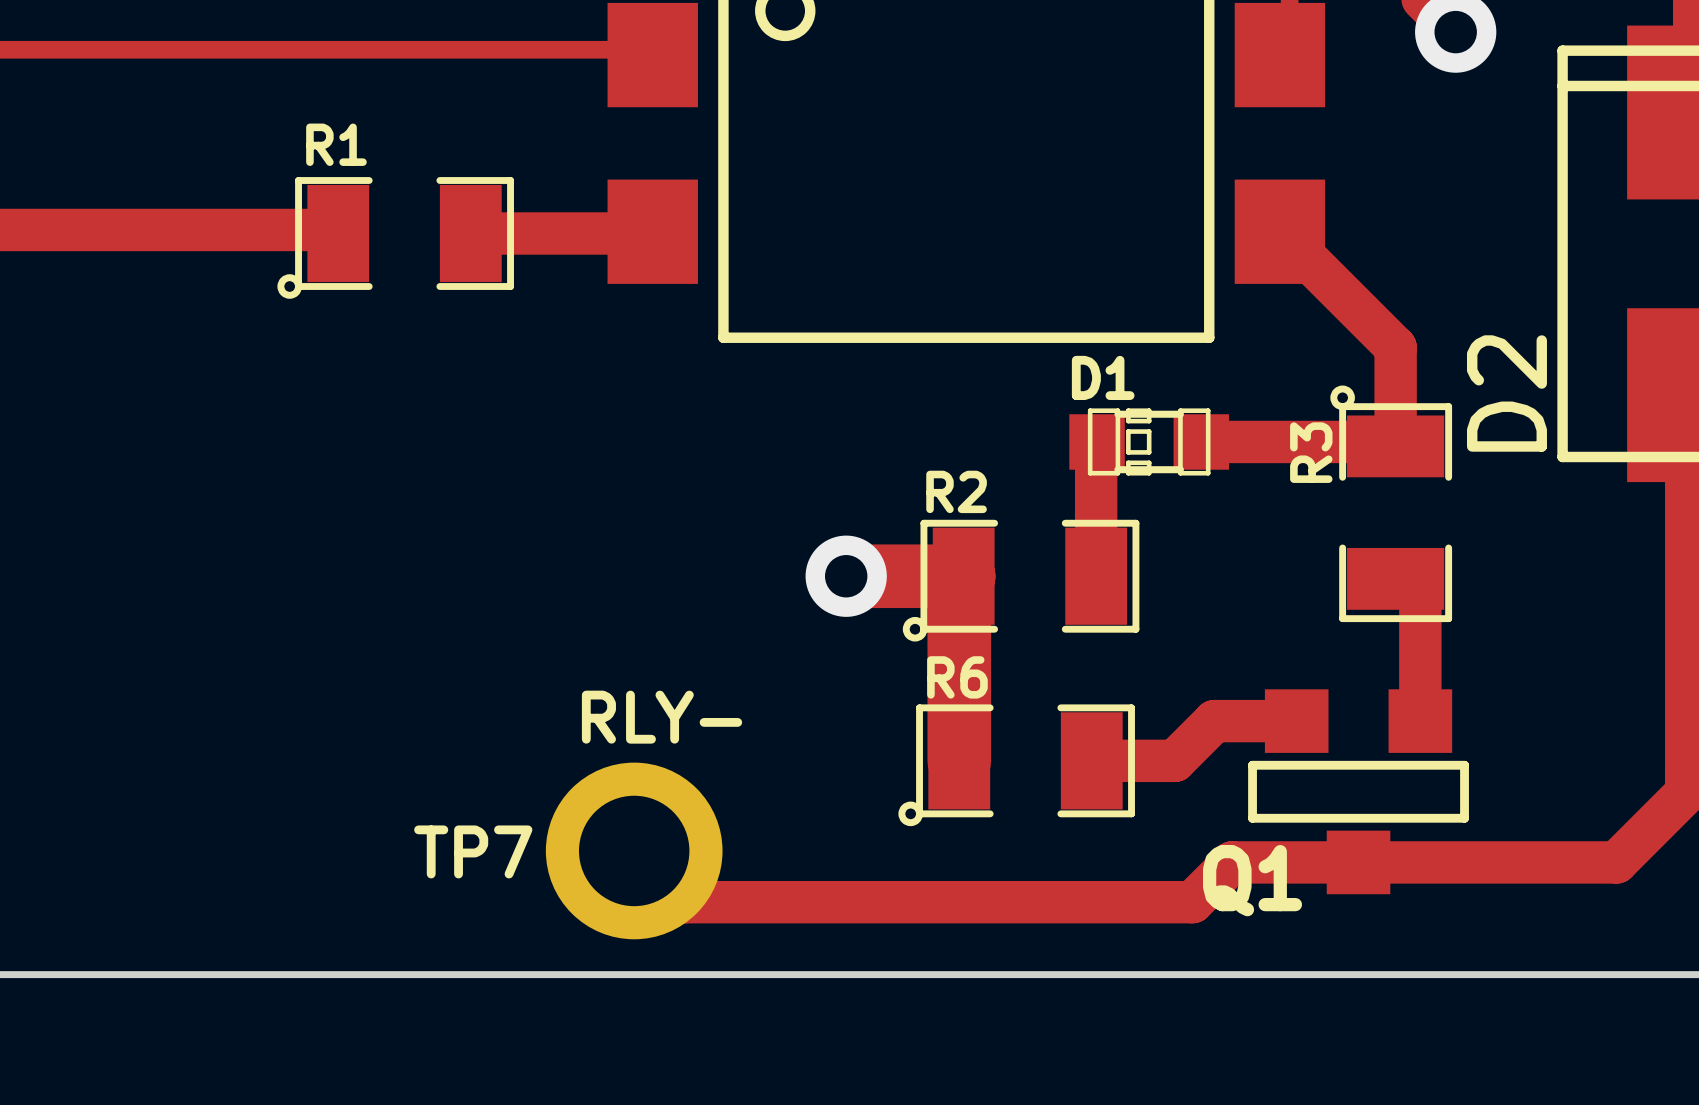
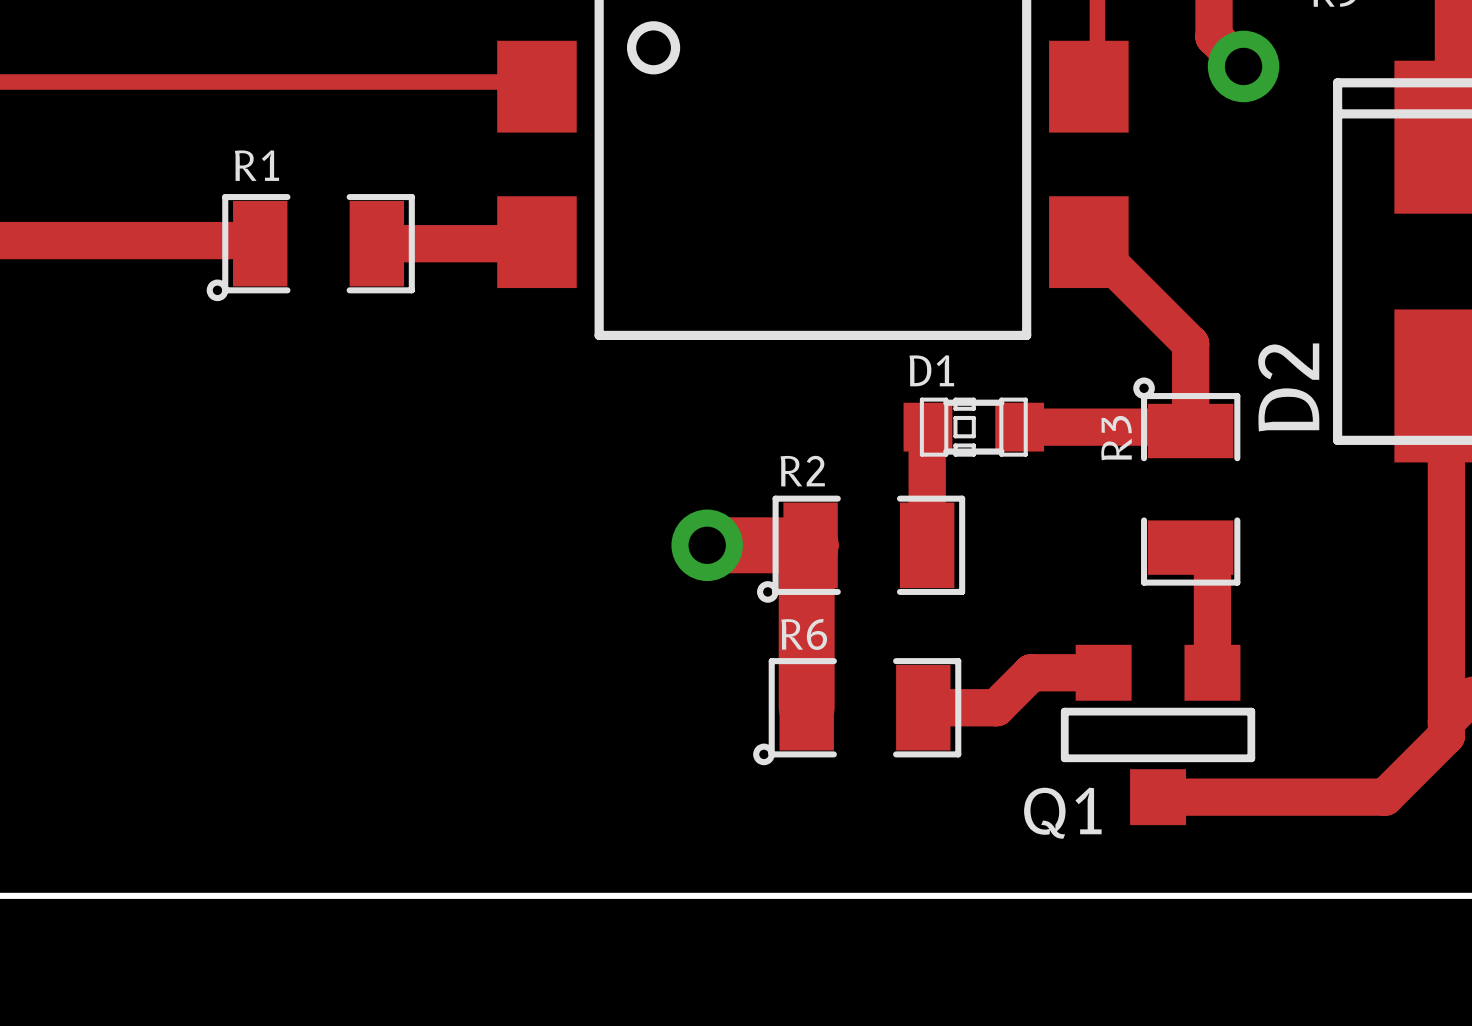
track: (634, 850) (685, 902) (1192, 902) (1232, 862) (1358, 862) -> none
TP7: RLY- (634, 850) -> none

